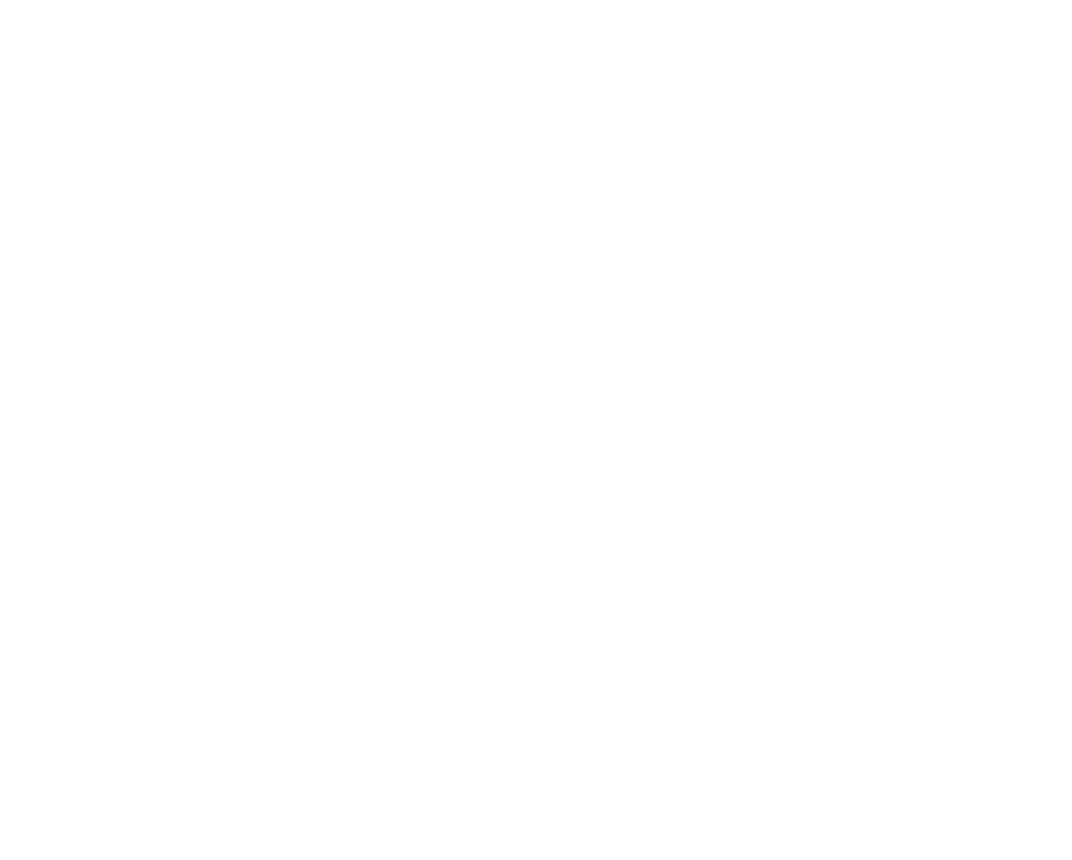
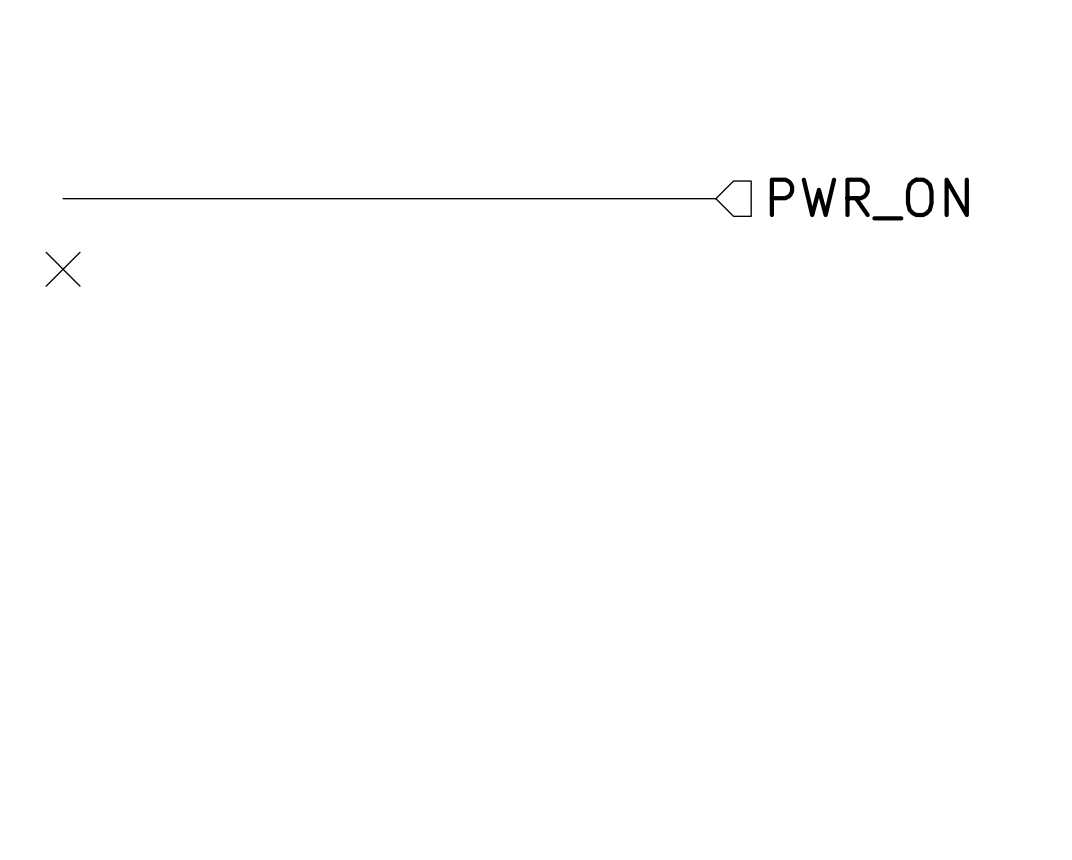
wire: none -> (63, 198) (715, 198)
hierarchical label: none -> PWR_ON (869, 199)
no-connect mark: none -> (63, 269)

